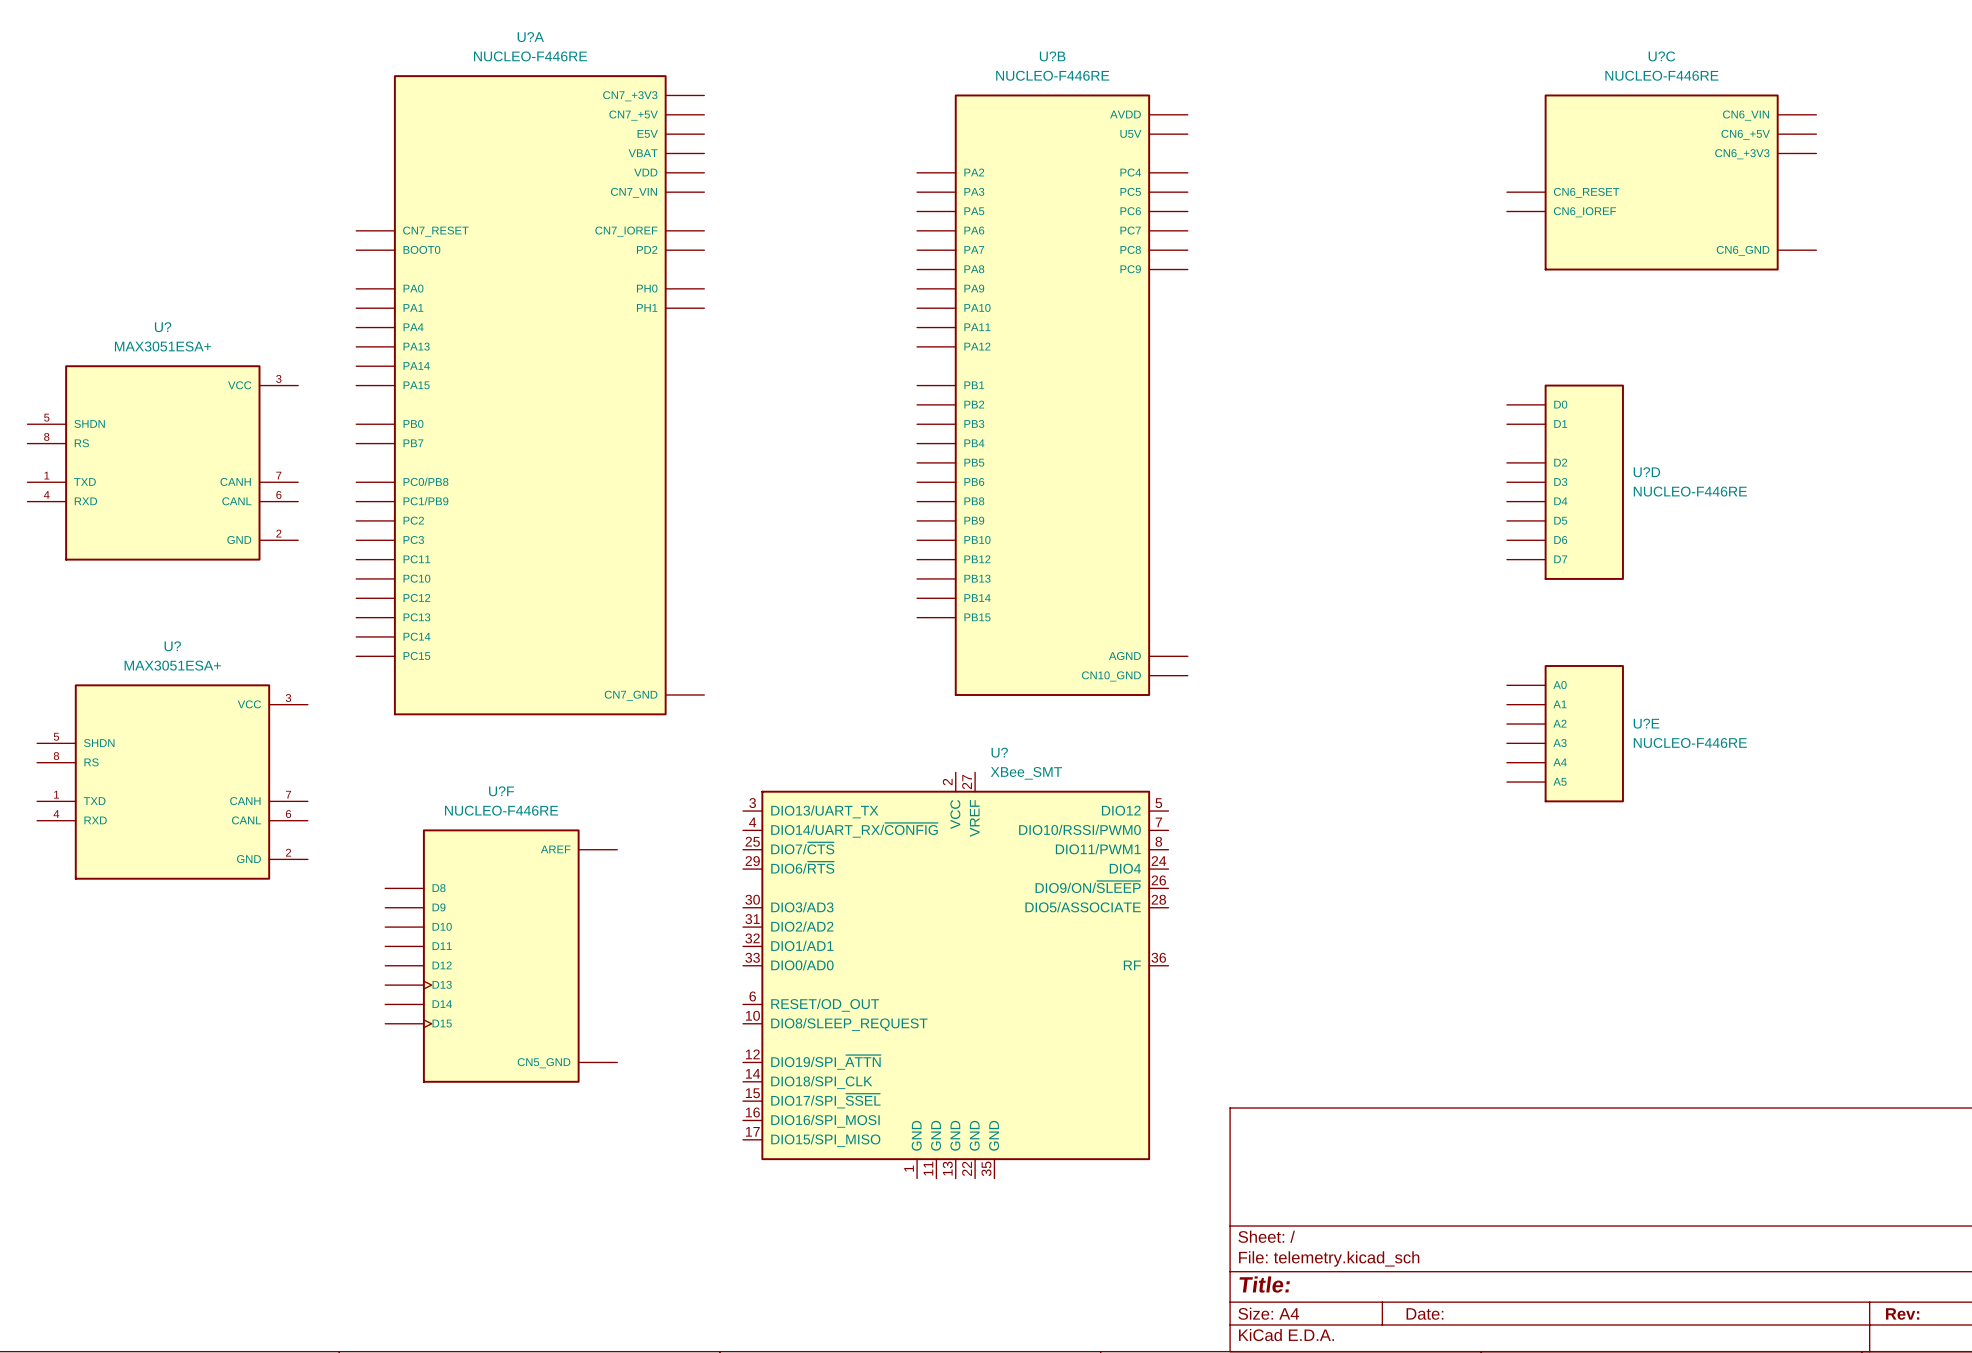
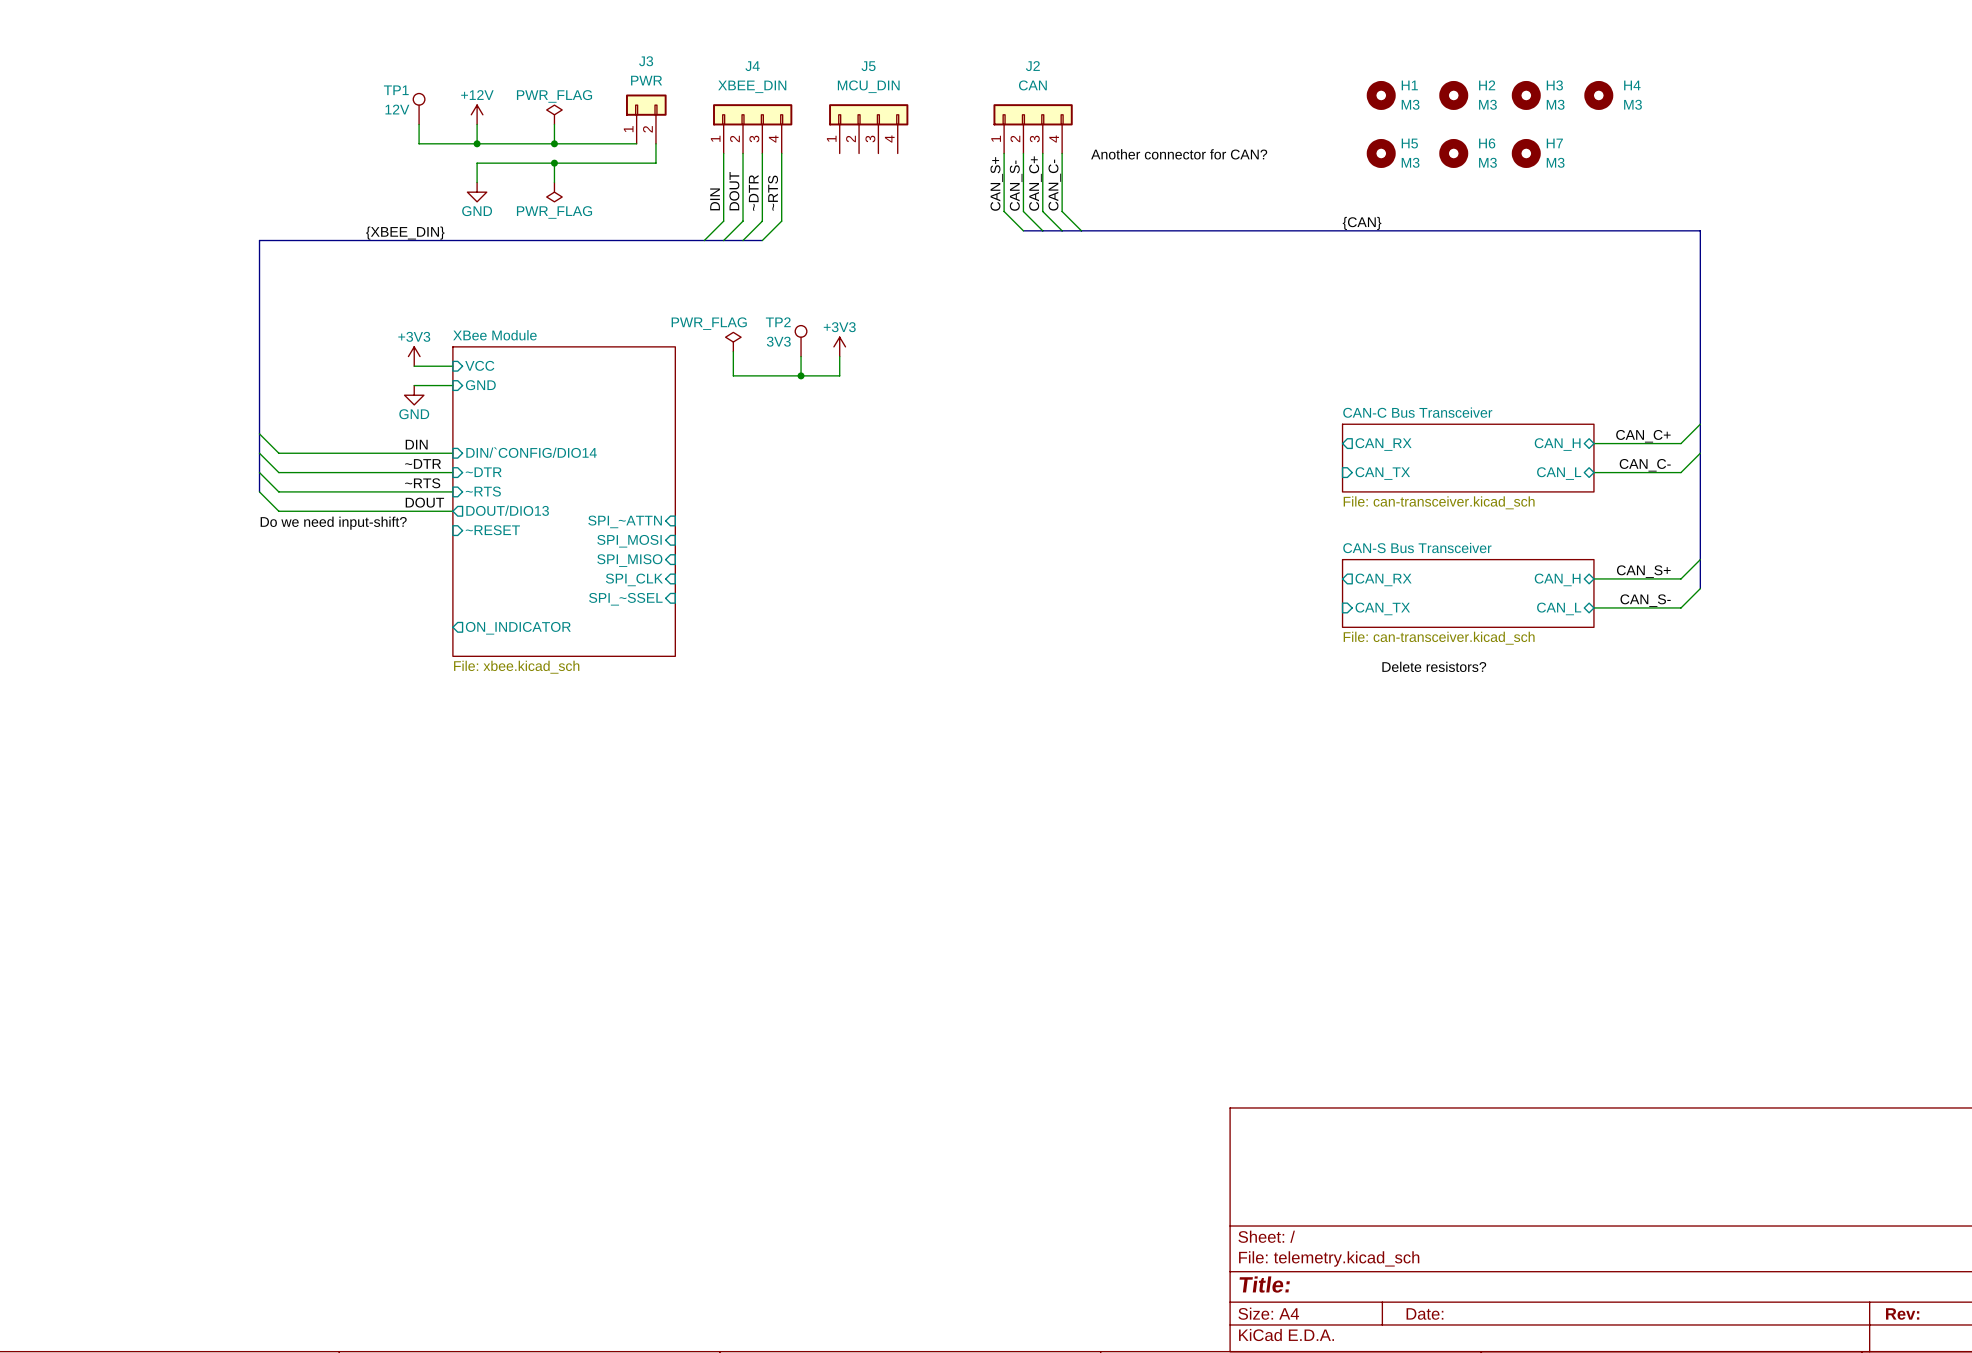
H1: none -> M3 (1381, 95)
H2: none -> M3 (1453, 95)
H3: none -> M3 (1526, 95)
H4: none -> M3 (1598, 95)
TP1: none -> 12V (419, 109)
power symbol: none -> +12V (477, 114)
power symbol: none -> PWR_FLAG (554, 114)
J3: none -> PWR (646, 119)
J4: none -> XBEE_DIN (752, 128)
J5: none -> MCU_DIN (868, 128)
J2: none -> CAN (1033, 128)
junction: none -> (477, 143)
junction: none -> (554, 143)
wire: none -> (723, 153) (723, 221) (704, 240)
wire: none -> (743, 153) (743, 221) (723, 240)
wire: none -> (762, 153) (762, 221) (743, 240)
wire: none -> (781, 153) (781, 221) (762, 240)
H5: none -> M3 (1381, 153)
H6: none -> M3 (1453, 153)
H7: none -> M3 (1526, 153)
label: none -> Another connector for CAN? (1179, 154)
junction: none -> (554, 163)
U?C: NUCLEO-F446RE (1661, 182) -> none
label: none -> CAN_S+ (996, 183)
label: none -> CAN_C+ (1035, 183)
label: none -> CAN_S- (1016, 185)
label: none -> CAN_C- (1054, 185)
label: none -> DOUT (734, 191)
power symbol: none -> GND (477, 192)
power symbol: none -> PWR_FLAG (554, 192)
label: none -> ~DTR (753, 192)
label: none -> ~RTS (773, 193)
label: none -> DIN (715, 199)
label: none -> {CAN} (1362, 223)
bus: none -> (1023, 230) (1700, 230) (1700, 588)
label: none -> {XBEE_DIN} (405, 233)
bus: none -> (762, 240) (259, 240) (259, 491)
TP2: none -> 3V3 (801, 341)
power symbol: none -> PWR_FLAG (733, 342)
power symbol: none -> +3V3 (839, 346)
wire: none -> (733, 351) (733, 375) (839, 375) (839, 356)
power symbol: none -> +3V3 (414, 356)
wire: none -> (801, 356) (801, 375)
sheet pin: none -> VCC (479, 365)
junction: none -> (801, 375)
sheet pin: none -> GND (480, 385)
power symbol: none -> GND (414, 395)
U?A: NUCLEO-F446RE (530, 395) -> none
U?B: NUCLEO-F446RE (1052, 395) -> none
wire: none -> (1700, 424) (1680, 443) (1593, 443)
wire: none -> (259, 433) (278, 453) (452, 453)
label: none -> CAN_C+ (1643, 436)
label: none -> DIN (416, 444)
sheet pin: none -> CAN_RX (1383, 444)
sheet pin: none -> CAN_H (1557, 444)
sheet pin: none -> DIN/`CONFIG/DIO14 (531, 452)
wire: none -> (259, 453) (278, 472) (452, 472)
wire: none -> (1700, 453) (1680, 472) (1593, 472)
sheet CAN-C Bus Transceiver: none -> File: can-transceiver.kicad_sch (1468, 458)
U?: MAX3051ESA+ (162, 462) -> none
label: none -> ~DTR (423, 463)
label: none -> CAN_C- (1645, 465)
wire: none -> (259, 472) (278, 491) (452, 491)
sheet pin: none -> ~DTR (483, 472)
sheet pin: none -> CAN_TX (1382, 473)
sheet pin: none -> CAN_L (1559, 473)
U?D: NUCLEO-F446RE (1565, 482) -> none
label: none -> ~RTS (422, 483)
wire: none -> (259, 491) (278, 511) (452, 511)
sheet pin: none -> ~RTS (483, 491)
sheet XBee Module: none -> File: xbee.kicad_sch (564, 501)
label: none -> DOUT (424, 502)
sheet pin: none -> DOUT/DIO13 (507, 510)
sheet pin: none -> SPI_~ATTN (625, 521)
label: none -> Do we need input-shift? (333, 523)
sheet pin: none -> ~RESET (492, 530)
sheet pin: none -> SPI_MOSI (629, 541)
wire: none -> (1700, 559) (1680, 578) (1593, 578)
sheet pin: none -> SPI_MISO (629, 560)
label: none -> CAN_S+ (1643, 571)
sheet pin: none -> SPI_CLK (634, 579)
sheet pin: none -> CAN_RX (1383, 579)
sheet pin: none -> CAN_H (1557, 579)
wire: none -> (1700, 588) (1680, 607) (1593, 607)
sheet CAN-S Bus Transceiver: none -> File: can-transceiver.kicad_sch (1468, 593)
sheet pin: none -> SPI_~SSEL (625, 599)
label: none -> CAN_S- (1645, 600)
sheet pin: none -> CAN_TX (1382, 608)
sheet pin: none -> CAN_L (1559, 608)
sheet pin: none -> ON_INDICATOR (518, 628)
label: none -> Delete resistors? (1434, 666)
U?E: NUCLEO-F446RE (1565, 733) -> none
U?: MAX3051ESA+ (172, 782) -> none
U?F: NUCLEO-F446RE (501, 956) -> none
U?: XBee_SMT (955, 975) -> none

